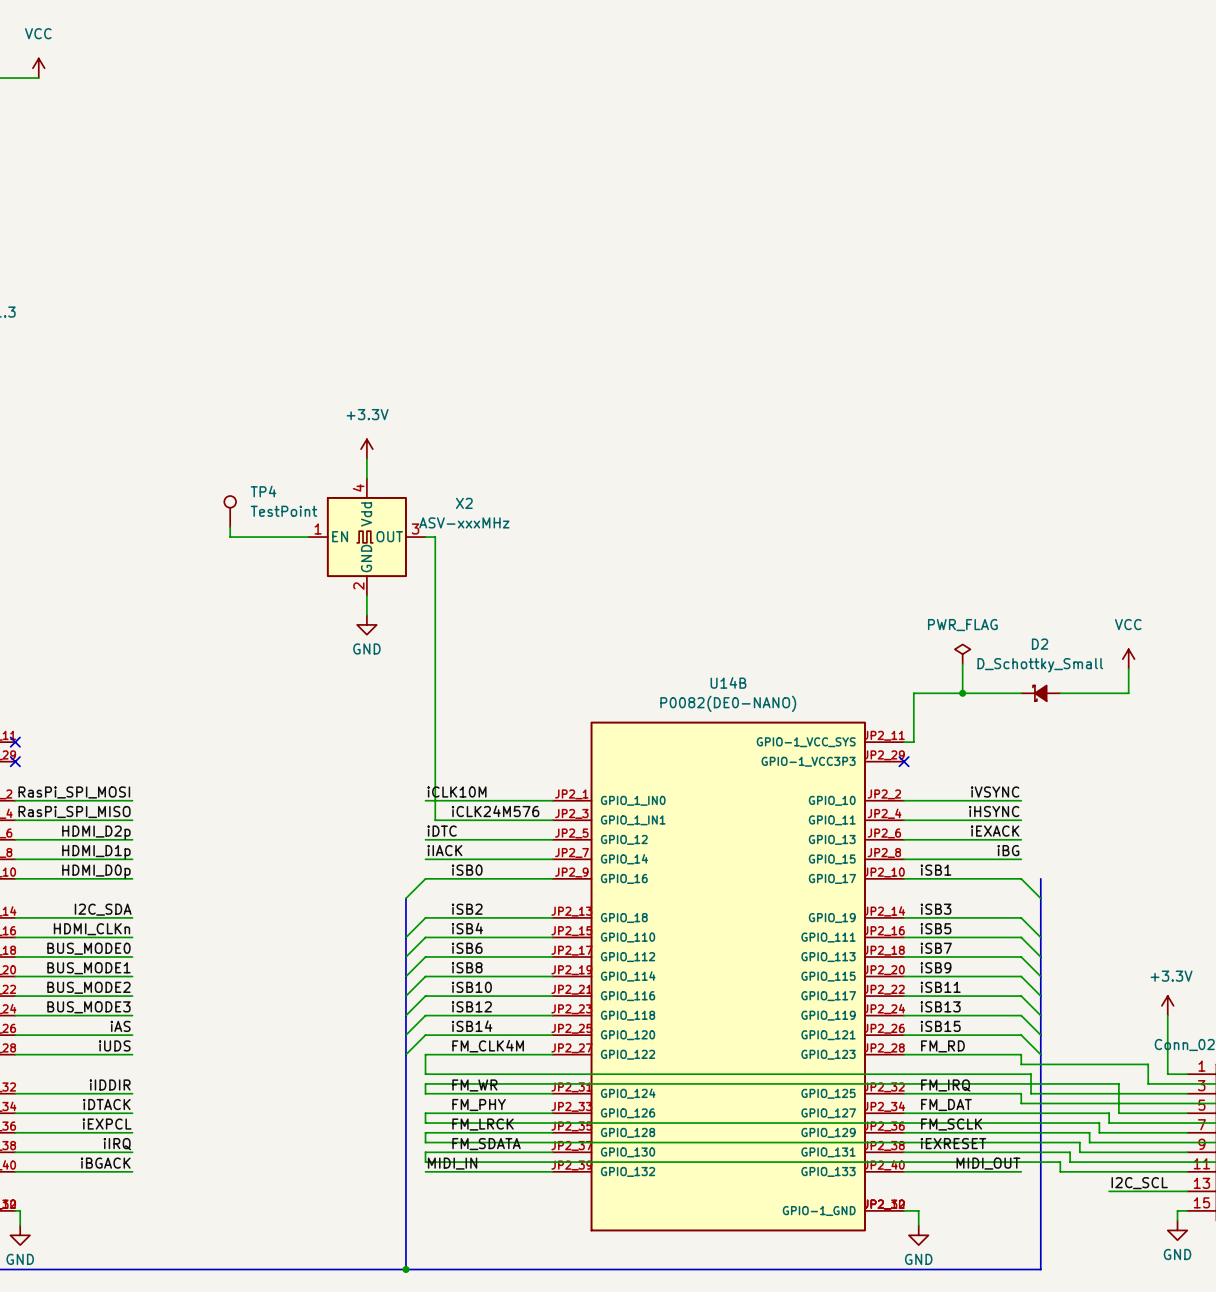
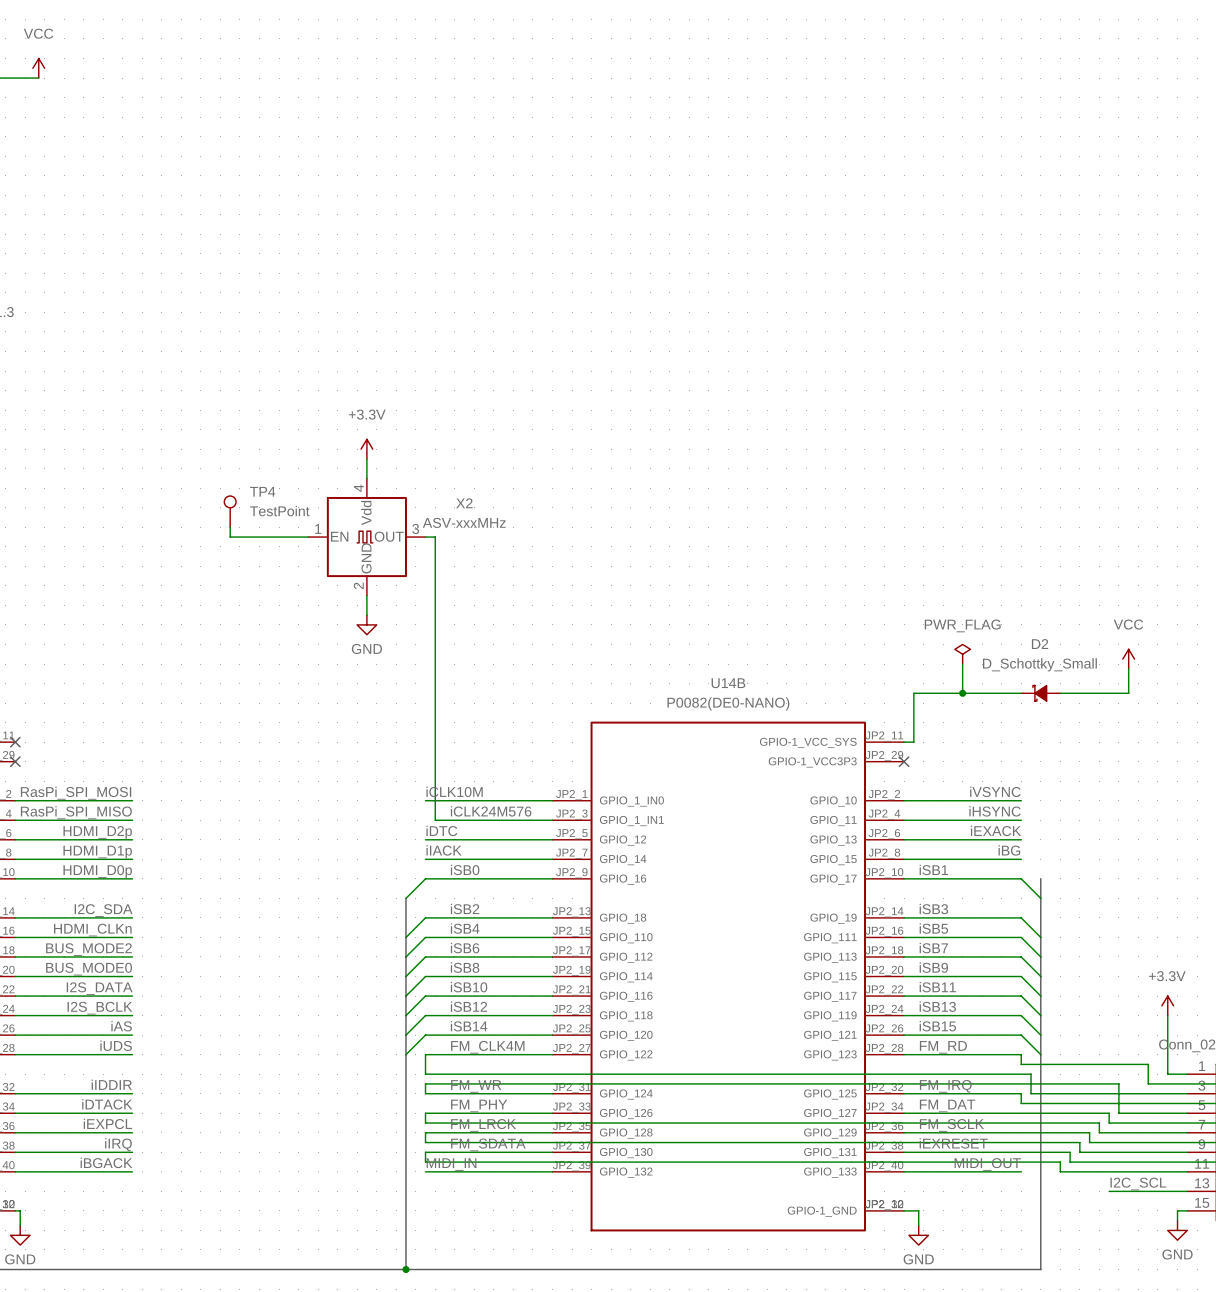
label: BUS_MODE0 (88, 948) -> BUS_MODE2 (88, 949)
label: BUS_MODE1 (88, 968) -> BUS_MODE0 (89, 969)
label: BUS_MODE2 (88, 987) -> I2S_DATA (99, 988)
label: BUS_MODE3 (88, 1007) -> I2S_BCLK (99, 1008)

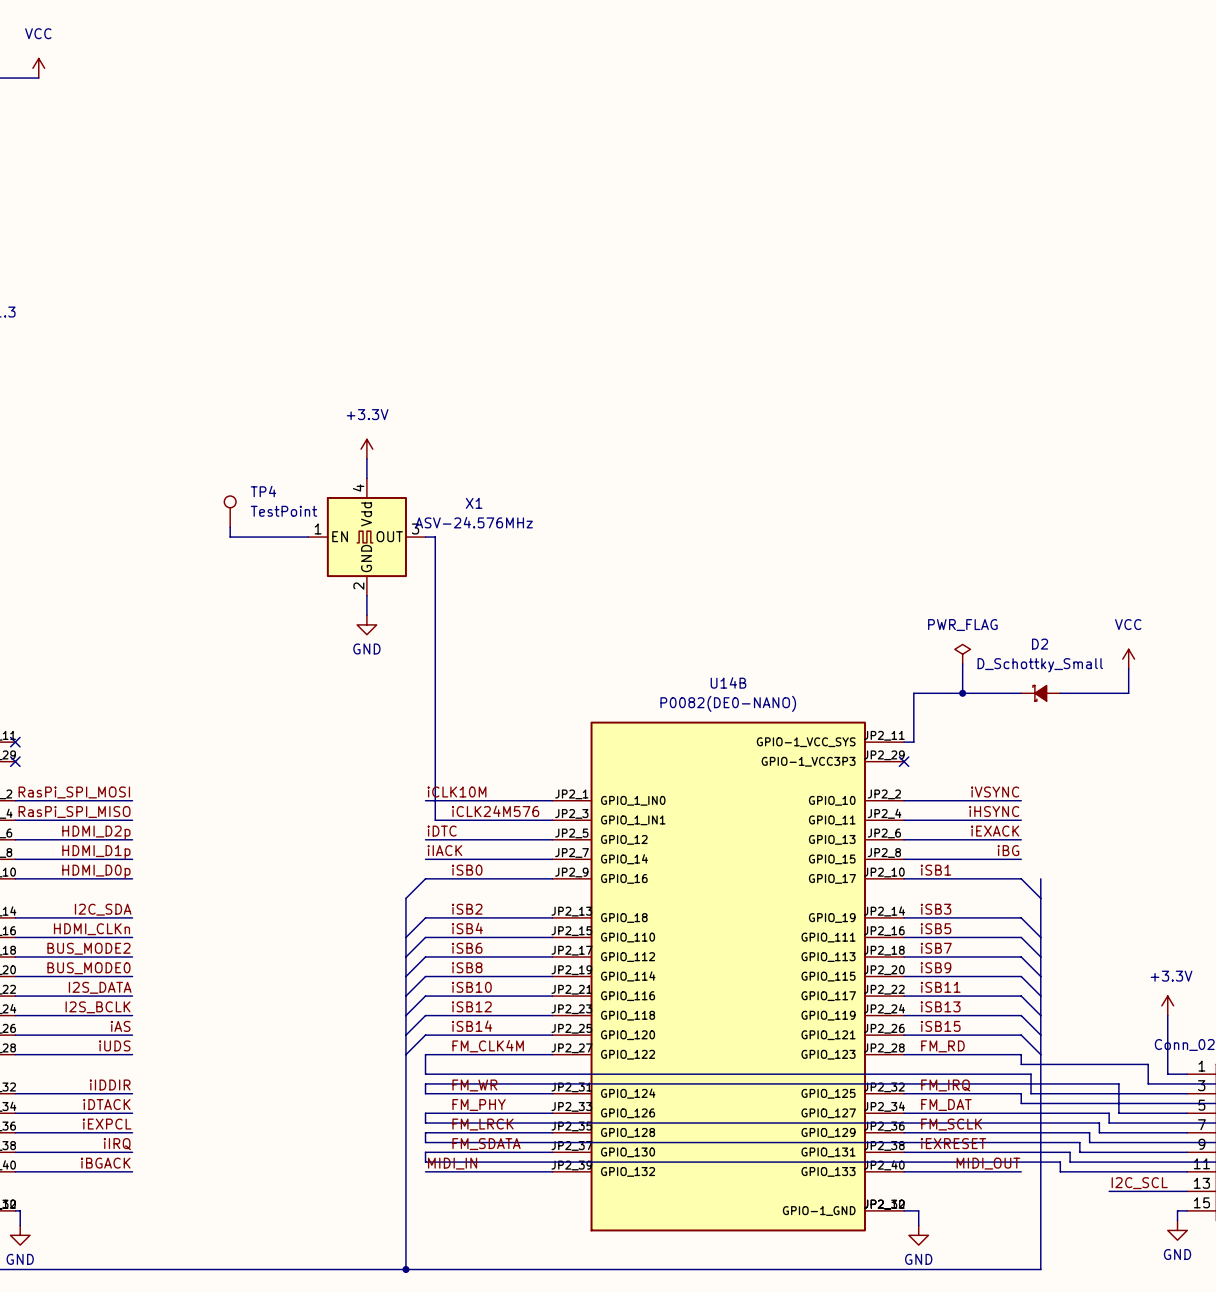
X2 name: X2 (464, 503) -> X1 (474, 503)
X2 value: ASV-xxxMHz (464, 522) -> ASV-24.576MHz (474, 522)

